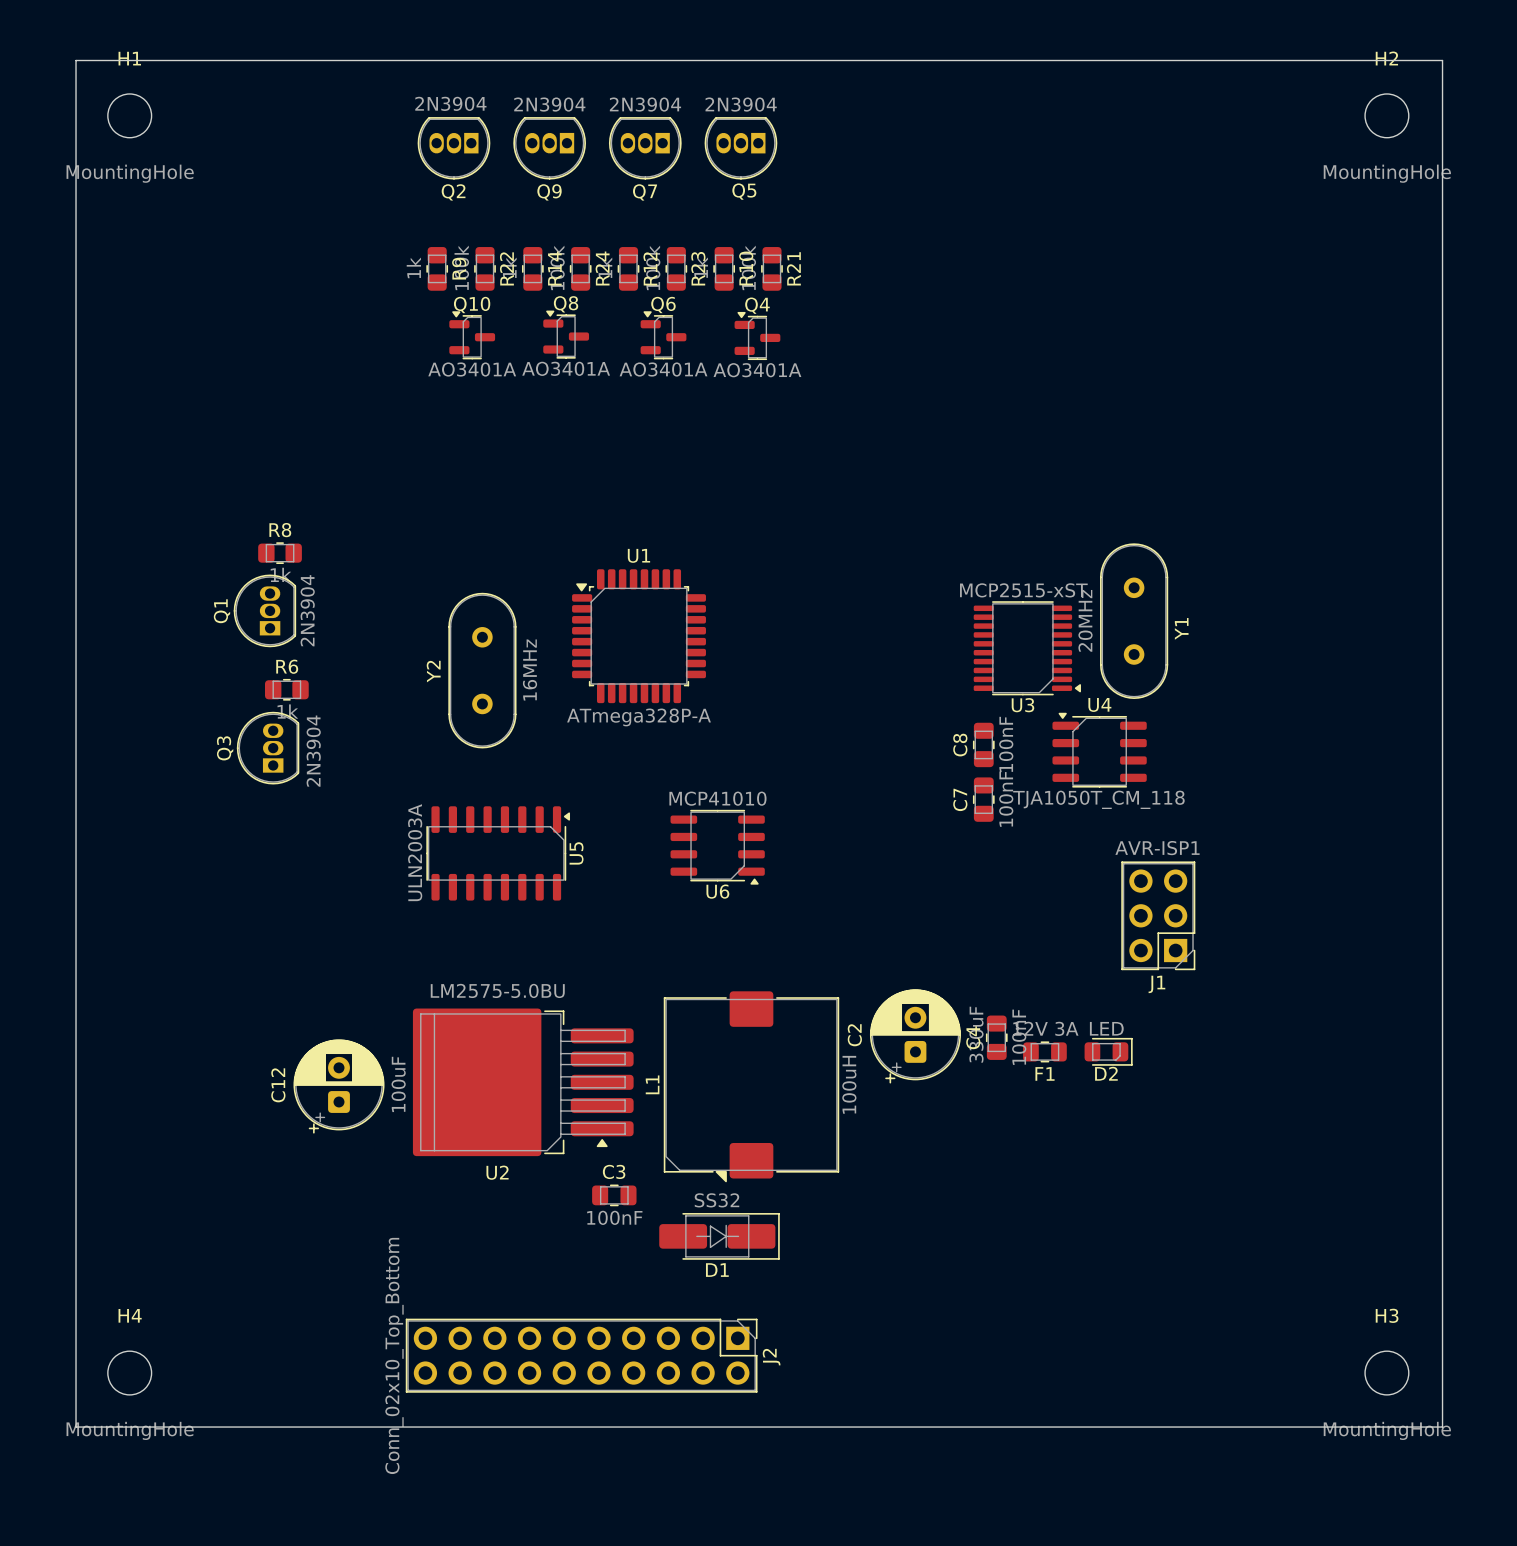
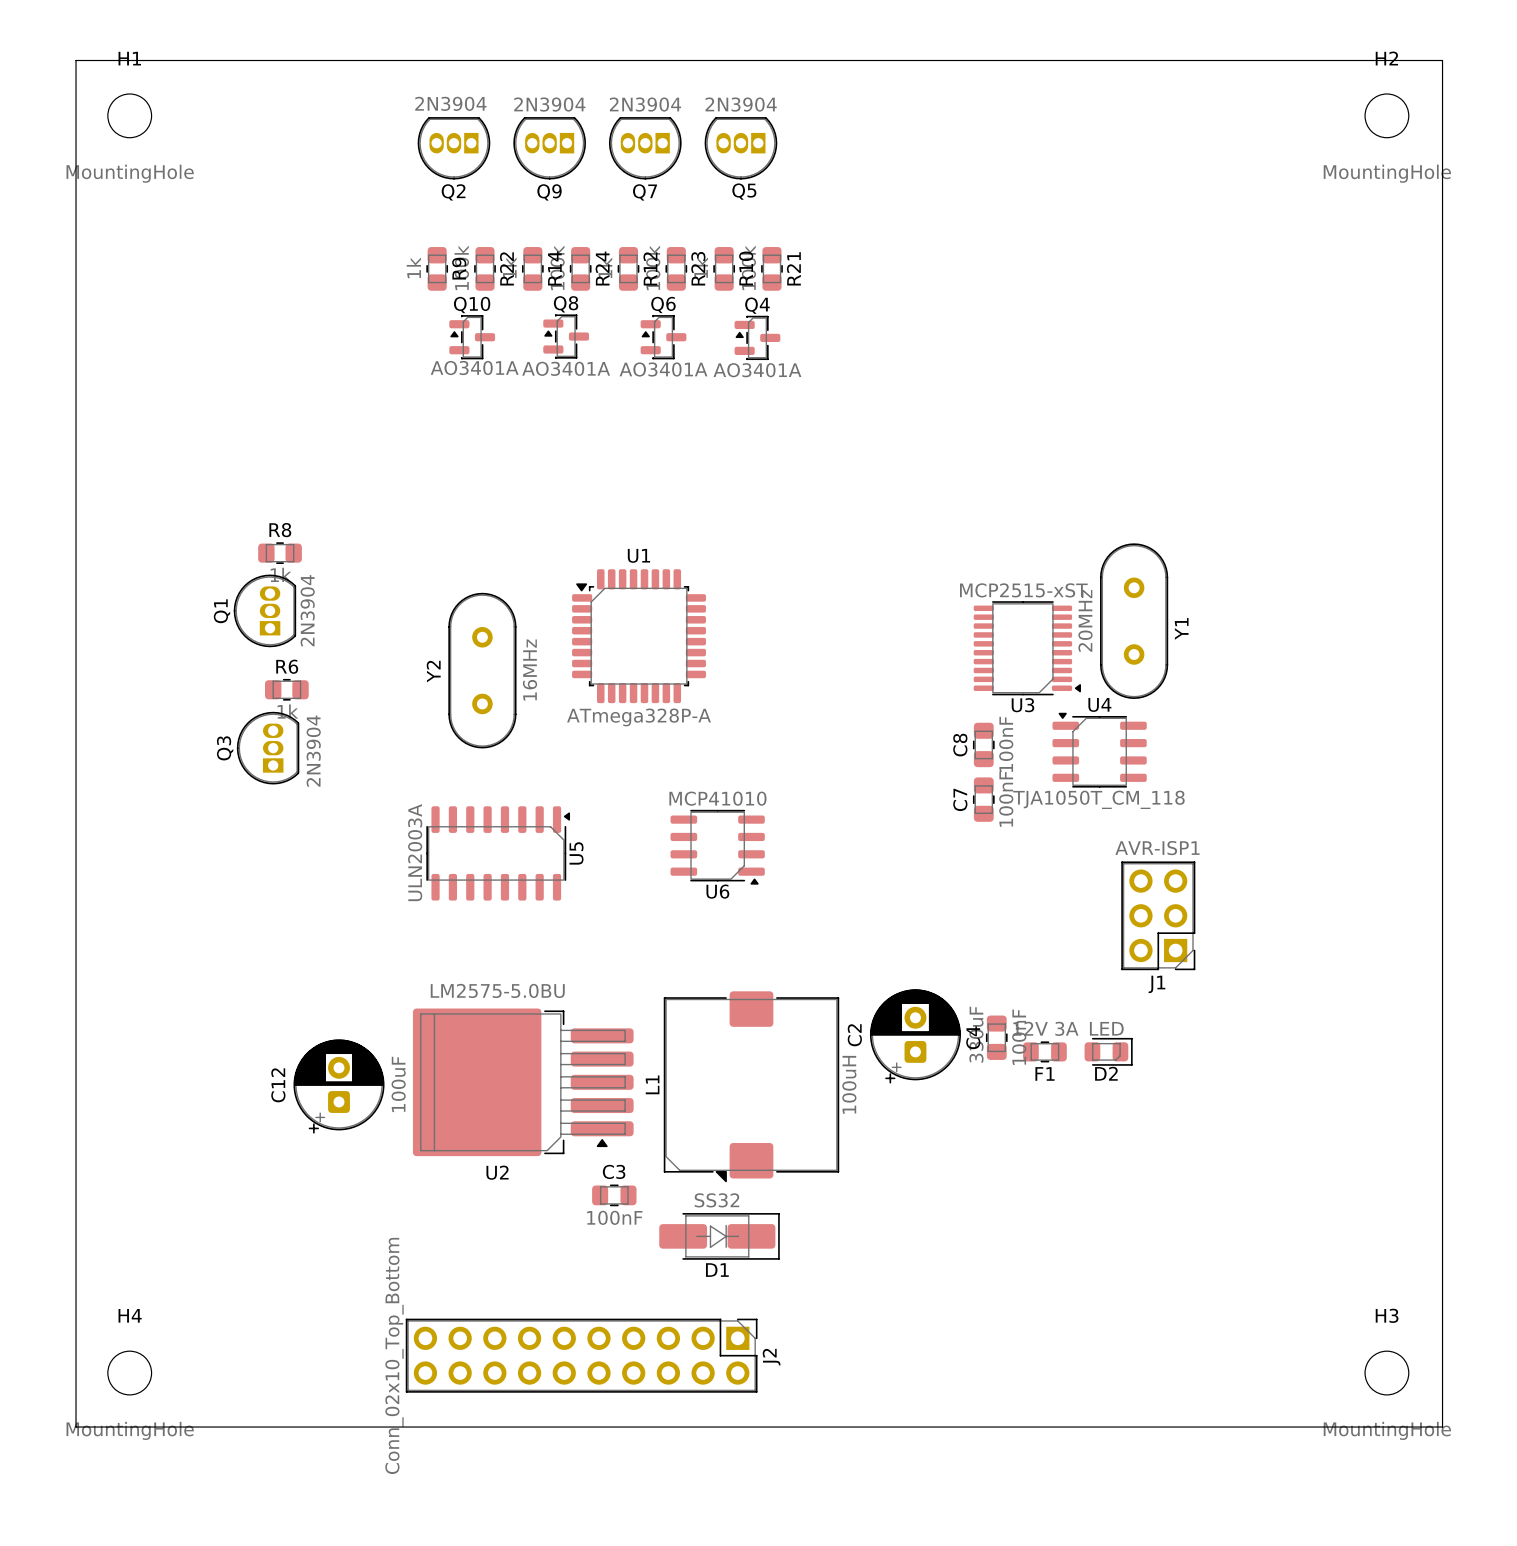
Q8 footprint: [543, 310, 590, 359] -> [543, 314, 590, 359]
Q10 footprint: [449, 311, 496, 360] -> [449, 315, 496, 360]
Q6 footprint: [640, 311, 687, 360] -> [640, 315, 687, 360]
Q4 footprint: [734, 311, 781, 361] -> [734, 315, 781, 361]

